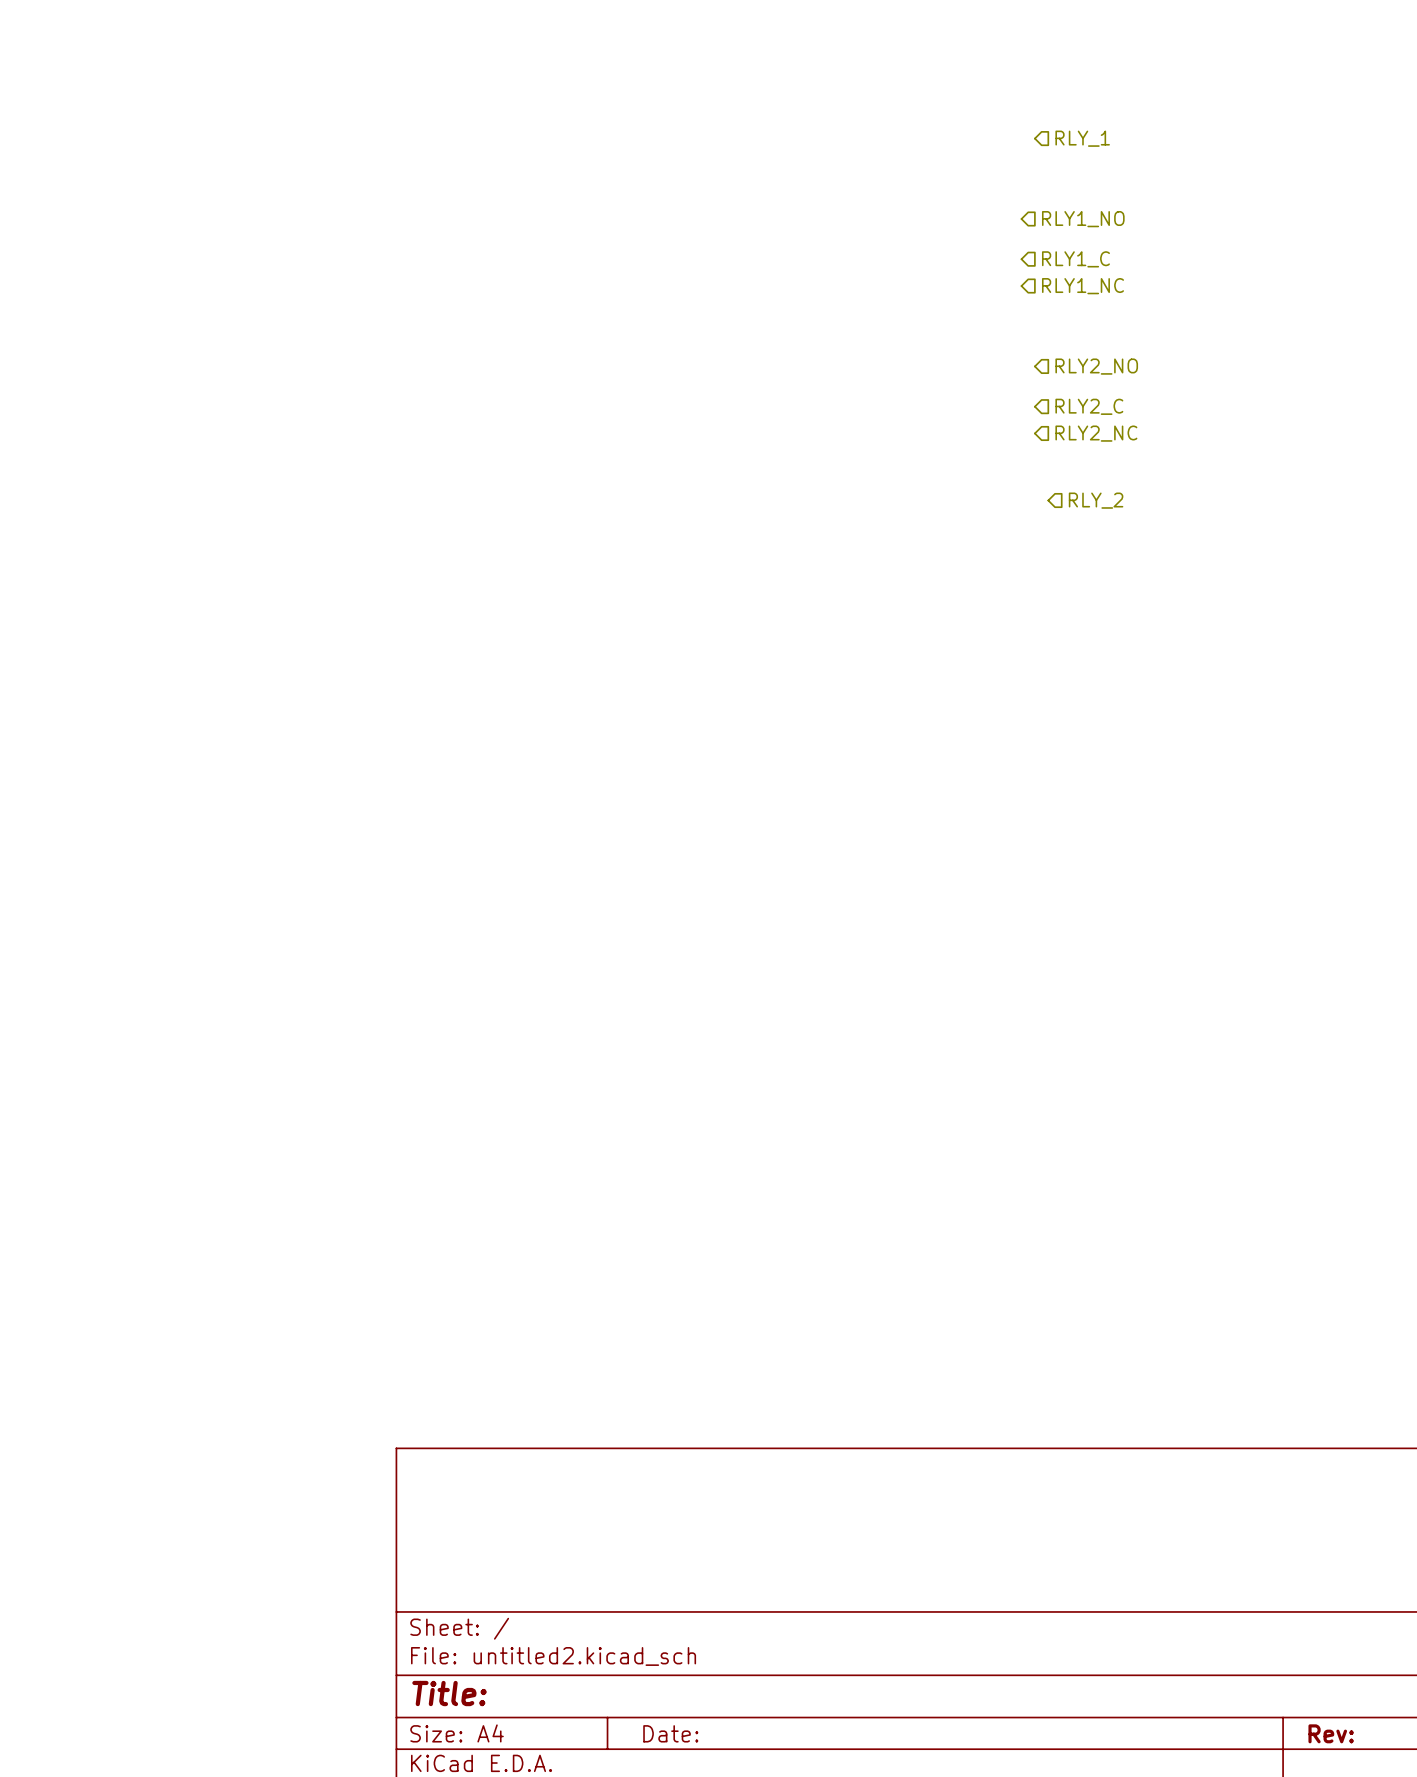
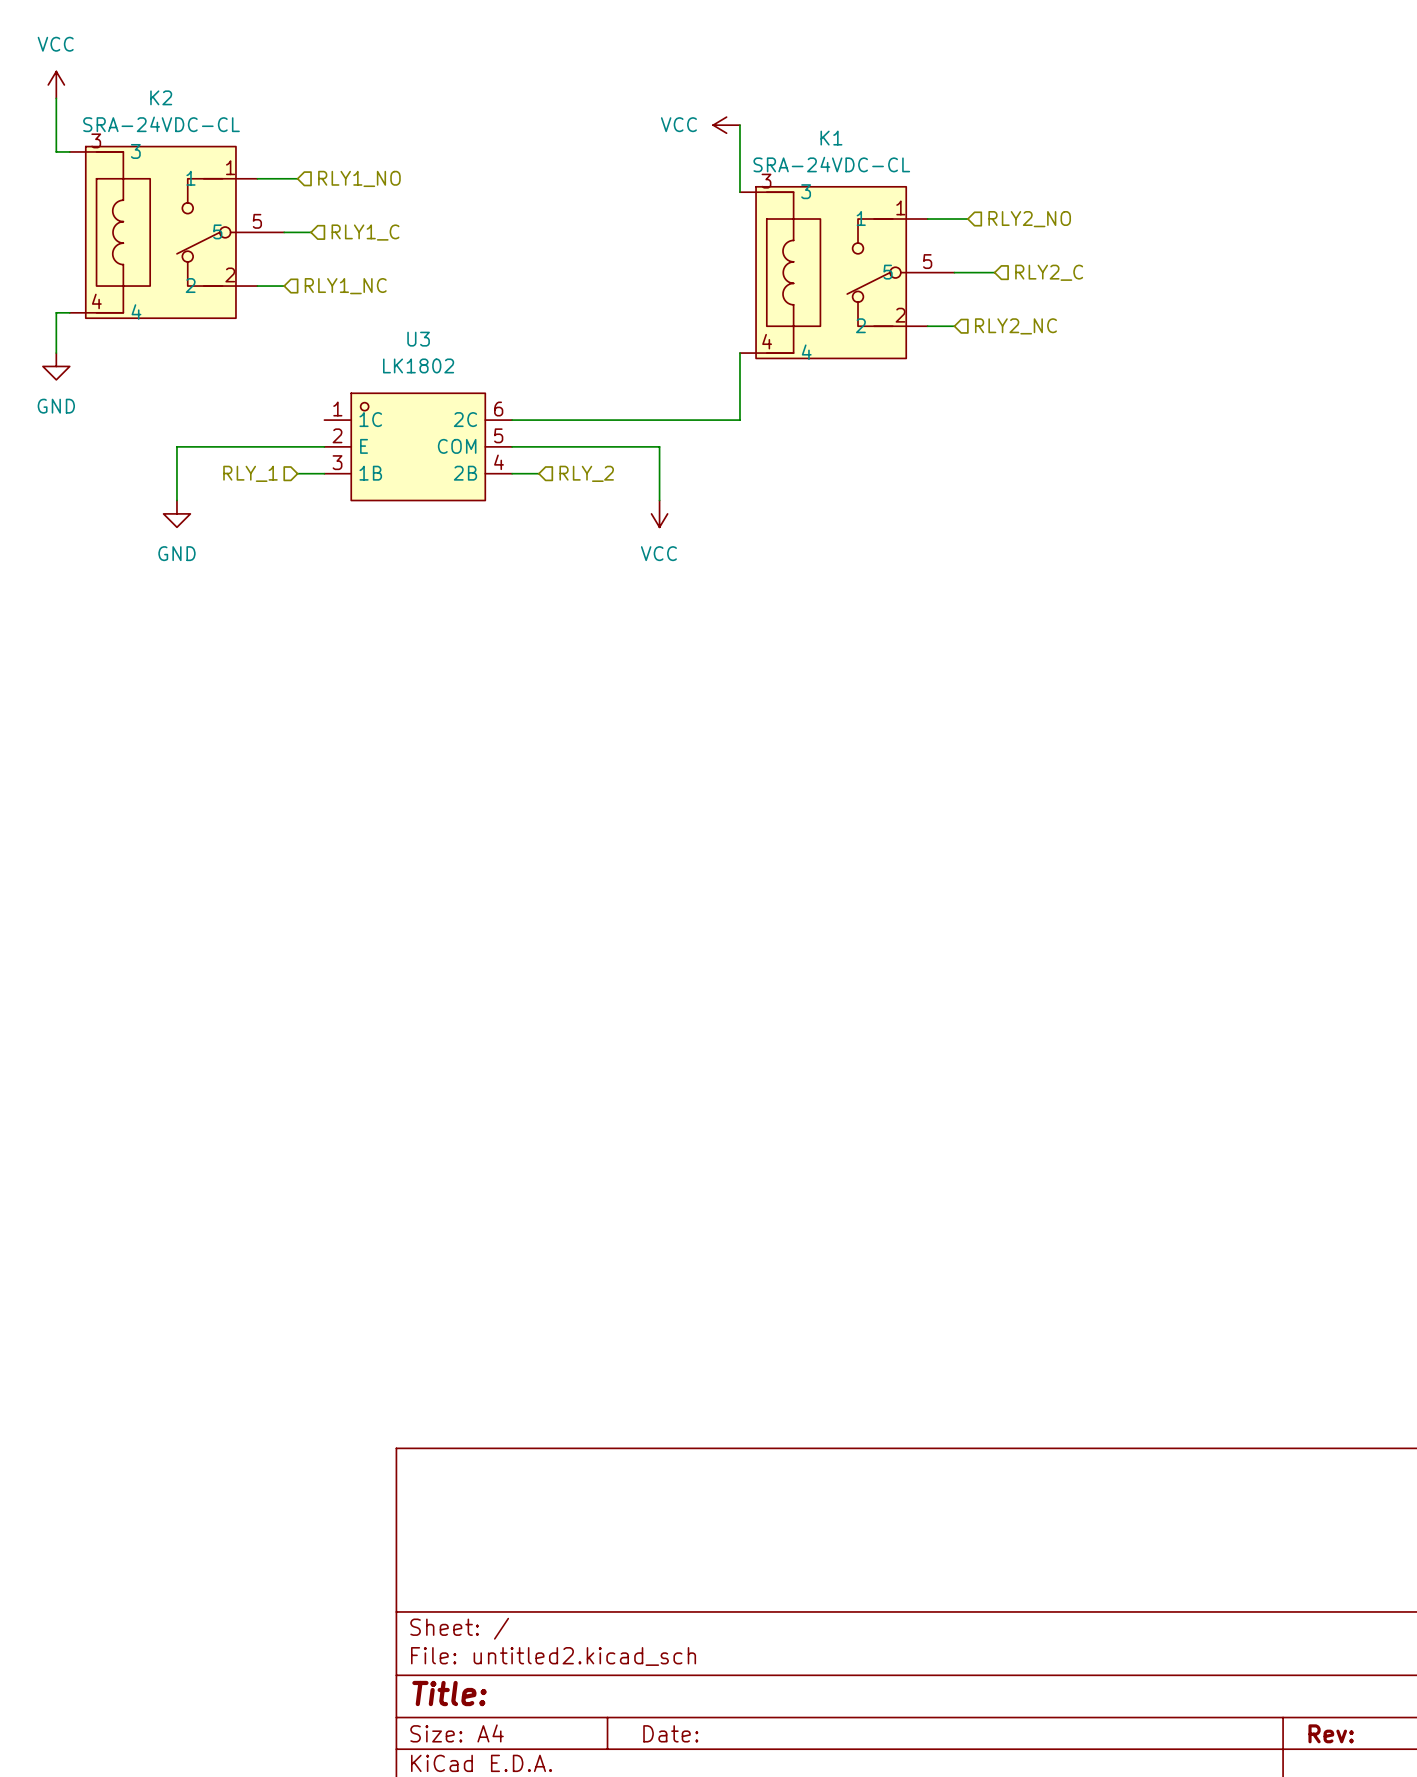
power symbol: none -> VCC (56, 84)
wire: none -> (56, 98) (56, 151) (69, 151)
power symbol: none -> VCC (726, 125)
wire: none -> (739, 125) (739, 192)
hierarchical label: RLY_1 (1082, 138) -> none
wire: none -> (257, 178) (297, 178)
hierarchical label: none -> RLY1_NO (359, 178)
wire: none -> (927, 219) (967, 219)
hierarchical label: RLY1_NO (1083, 219) -> none
K2: none -> SRA-24VDC-CL (176, 232)
wire: none -> (284, 232) (311, 232)
hierarchical label: none -> RLY1_C (365, 232)
hierarchical label: RLY1_C (1075, 259) -> none
K1: none -> SRA-24VDC-CL (847, 272)
wire: none -> (954, 272) (994, 272)
wire: none -> (257, 286) (284, 286)
hierarchical label: none -> RLY1_NC (345, 286)
hierarchical label: RLY1_NC (1082, 286) -> none
wire: none -> (69, 312) (56, 312) (56, 353)
wire: none -> (927, 326) (954, 326)
wire: none -> (739, 353) (739, 420) (512, 420)
power symbol: none -> GND (56, 366)
hierarchical label position: RLY2_NO (1096, 366) -> RLY2_NO (1029, 219)
hierarchical label position: RLY2_C (1089, 406) -> RLY2_C (1049, 272)
hierarchical label position: RLY2_NC (1096, 433) -> RLY2_NC (1015, 326)
wire: none -> (324, 446) (176, 446) (176, 500)
U3: none -> LK1802 (418, 446)
wire: none -> (512, 446) (659, 446) (659, 500)
hierarchical label: none -> RLY_1 (250, 473)
wire: none -> (297, 473) (324, 473)
wire: none -> (512, 473) (538, 473)
hierarchical label: none -> RLY_2 (586, 473)
hierarchical label: RLY_2 (1096, 500) -> none
power symbol: none -> GND (176, 513)
power symbol: none -> VCC (659, 513)

